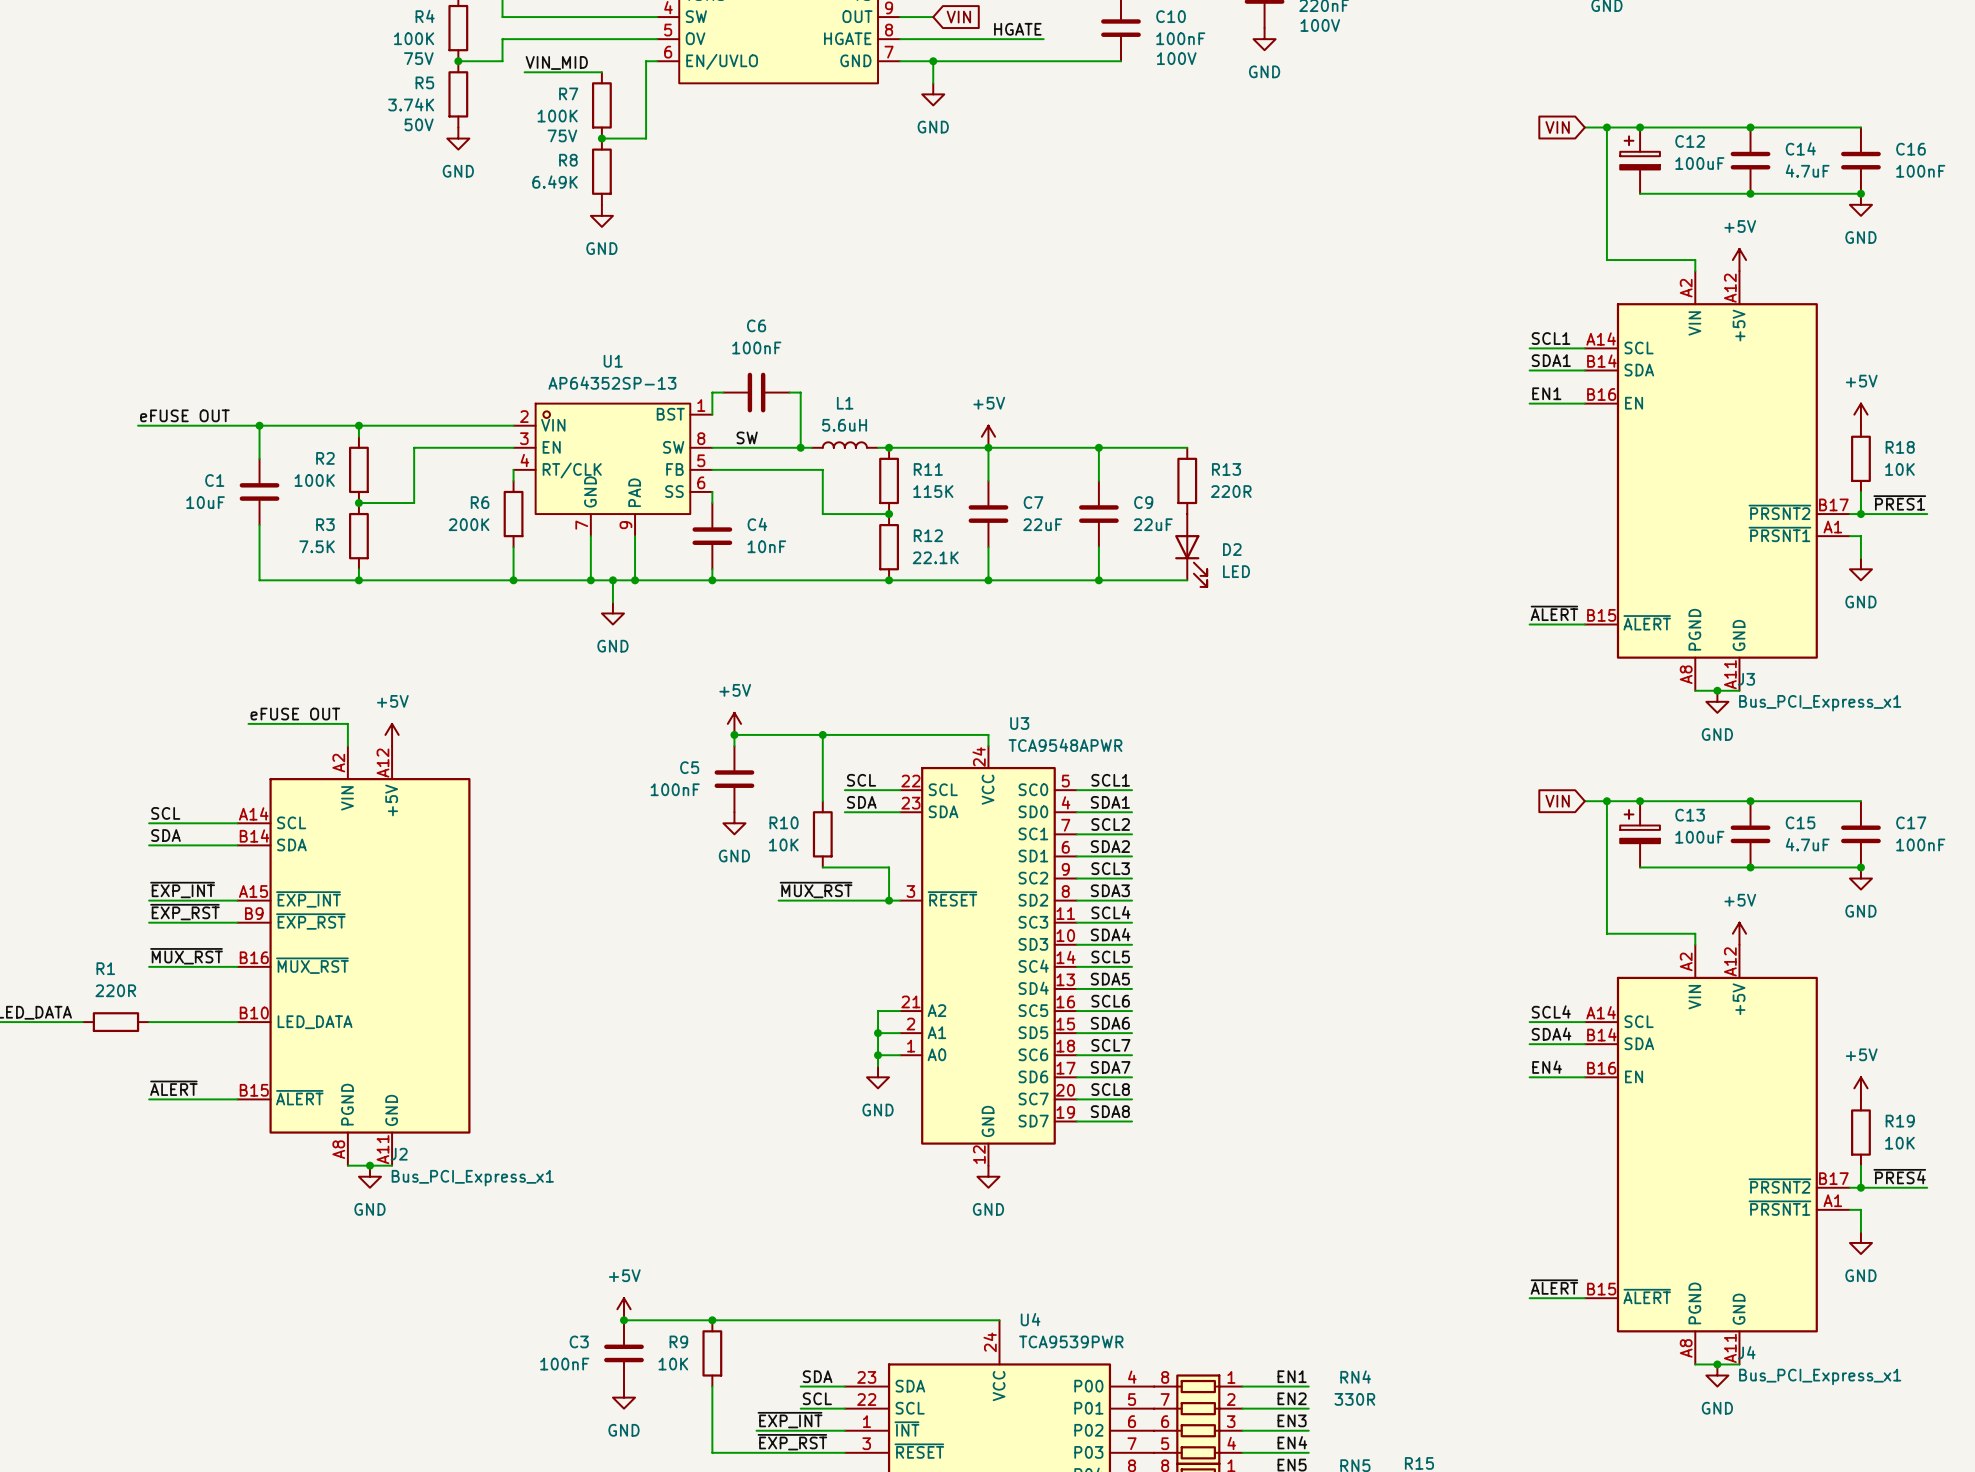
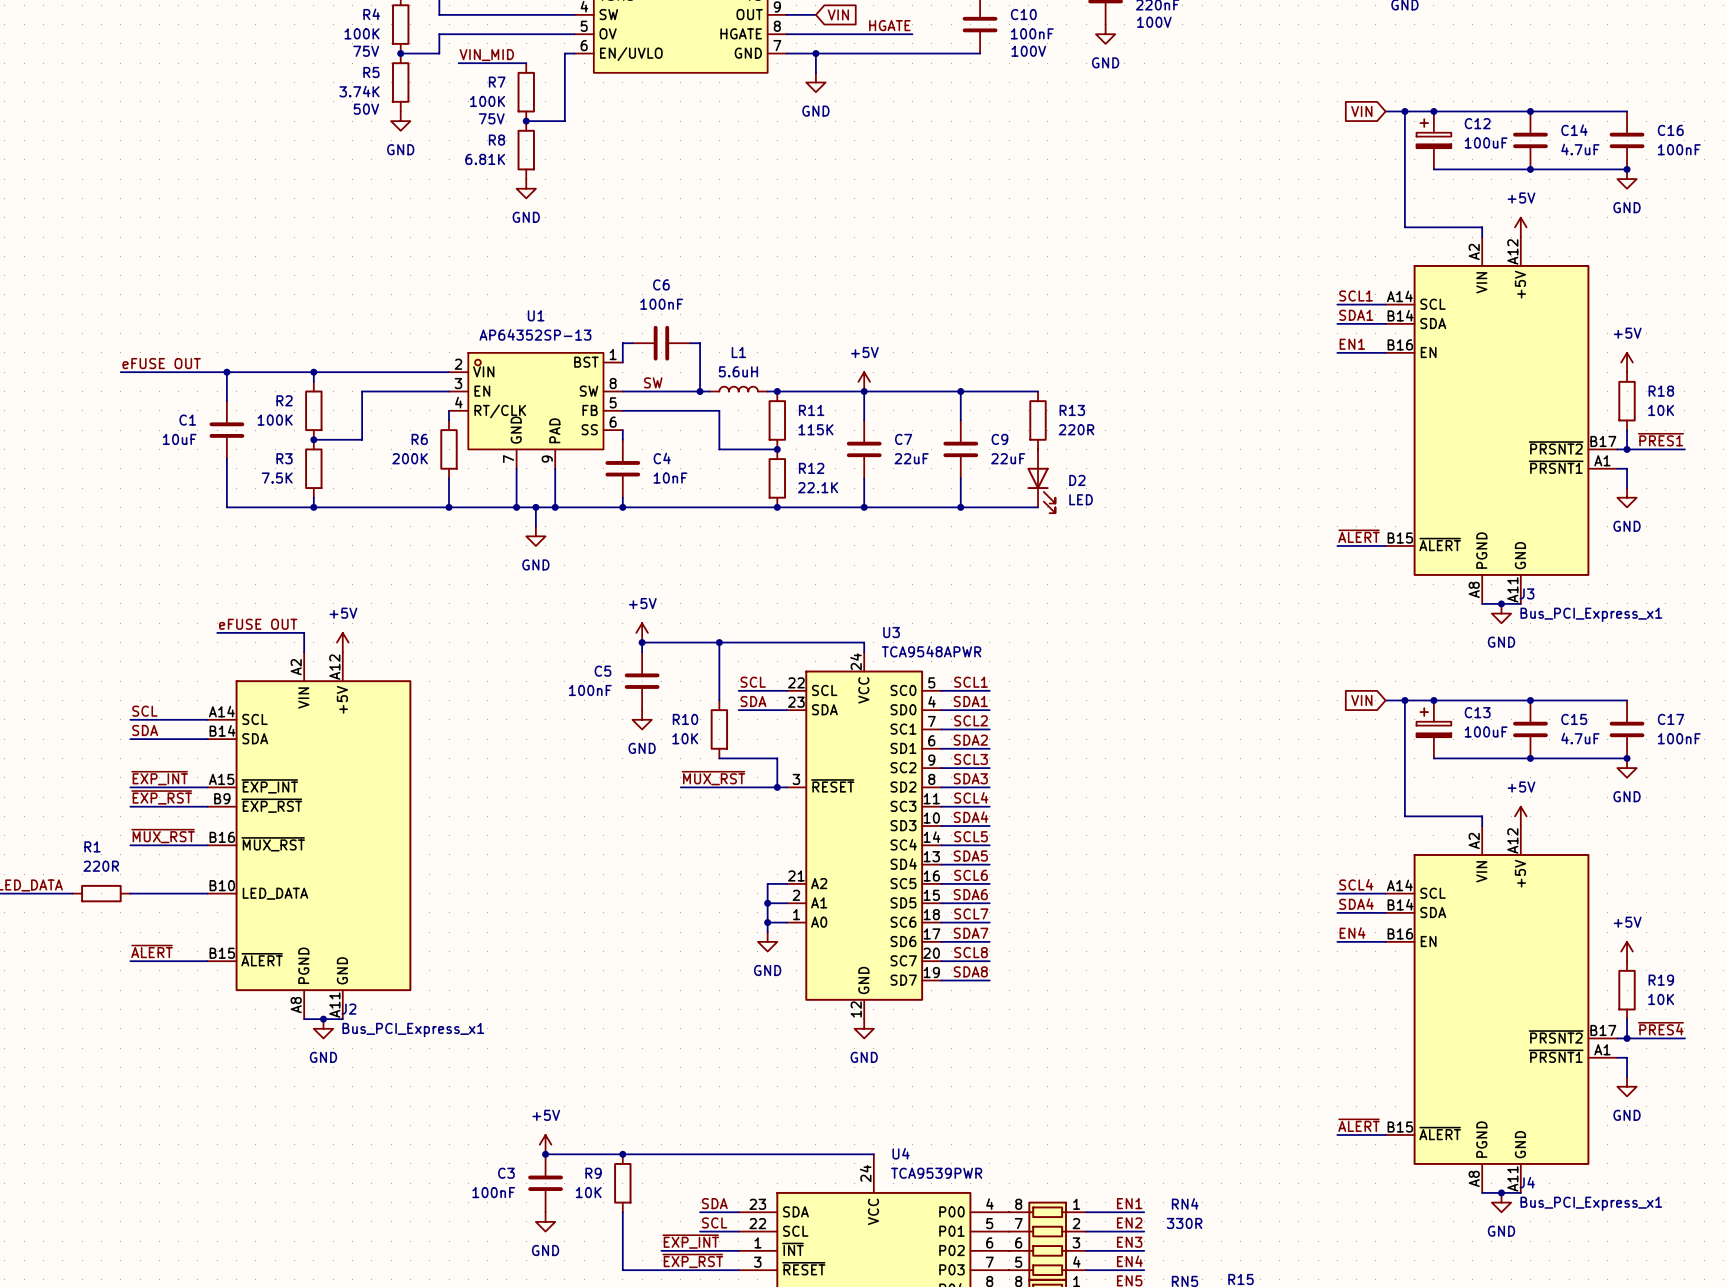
R8 value: 6.49K (555, 182) -> 6.81K (485, 159)

